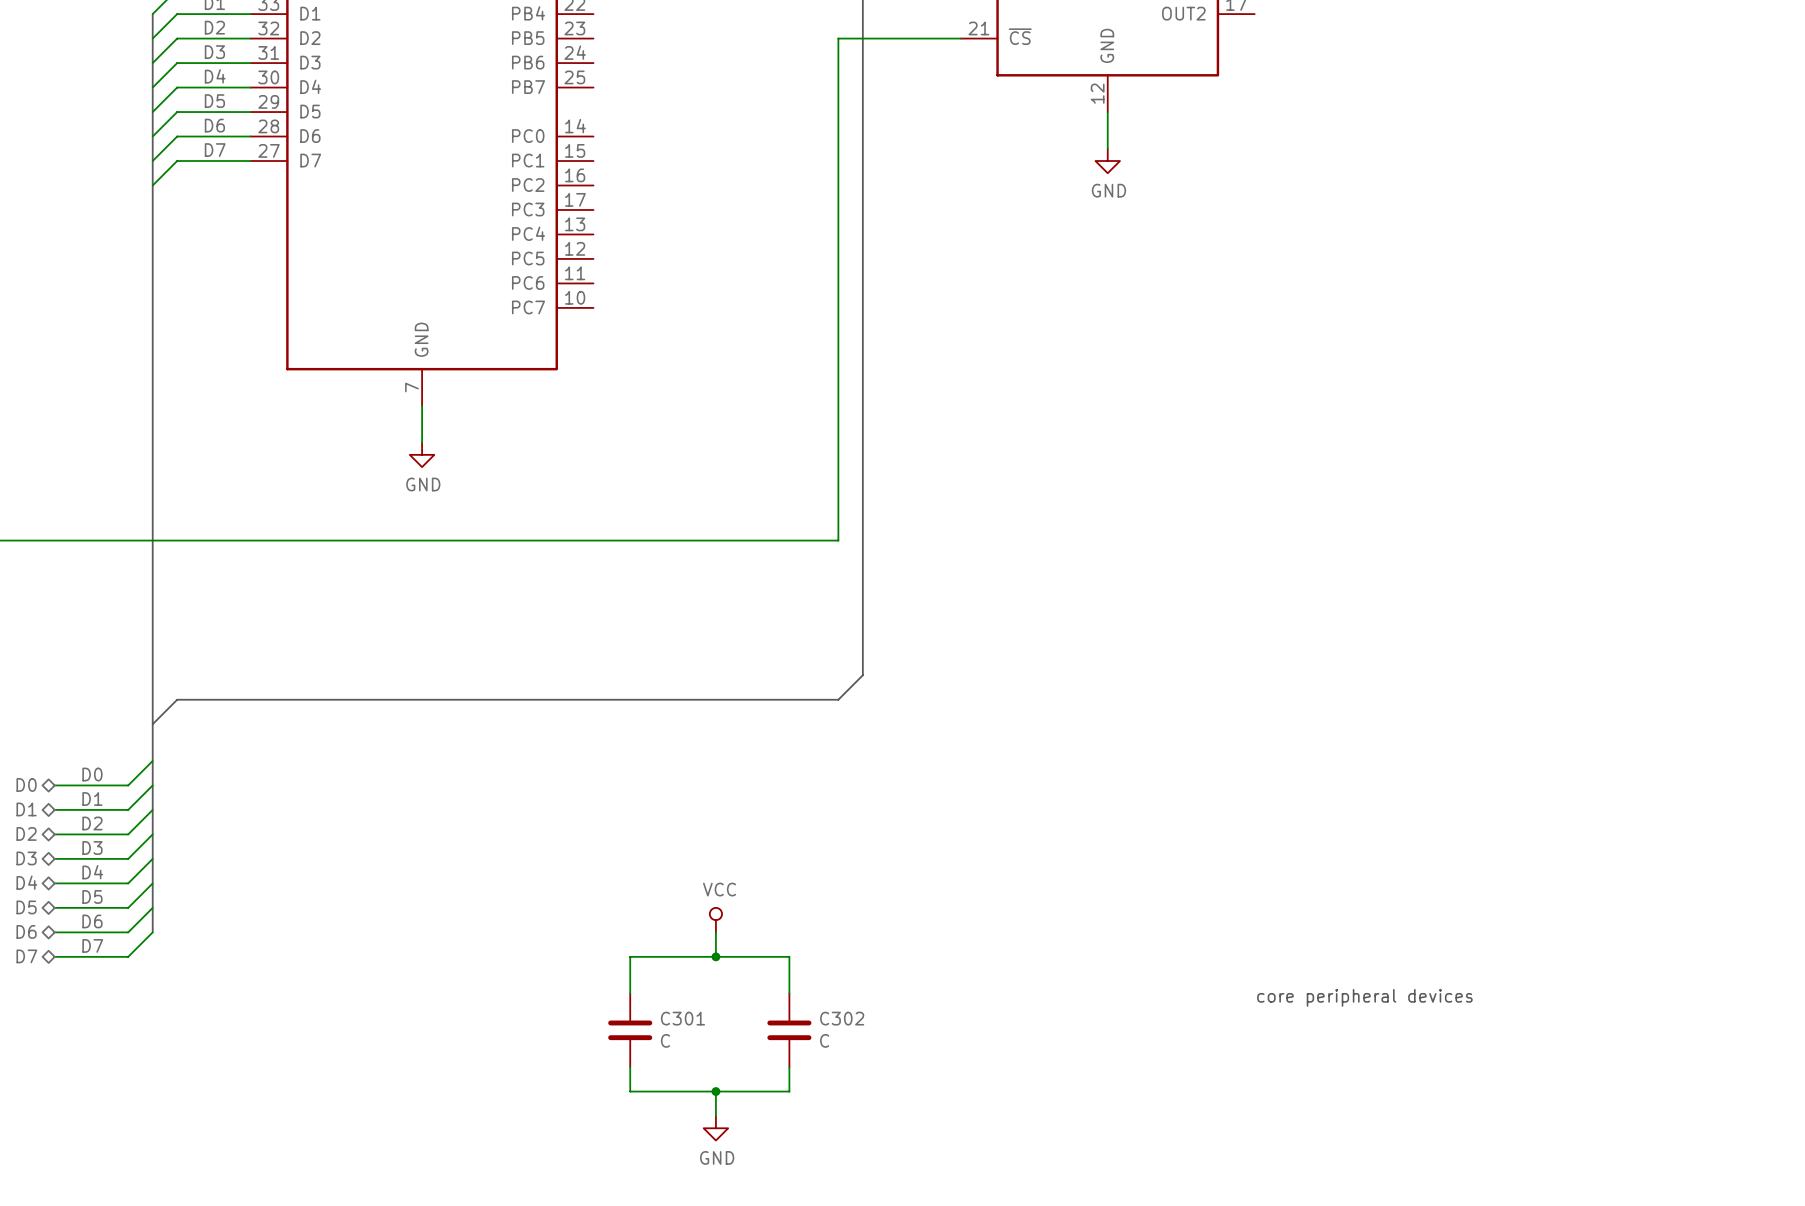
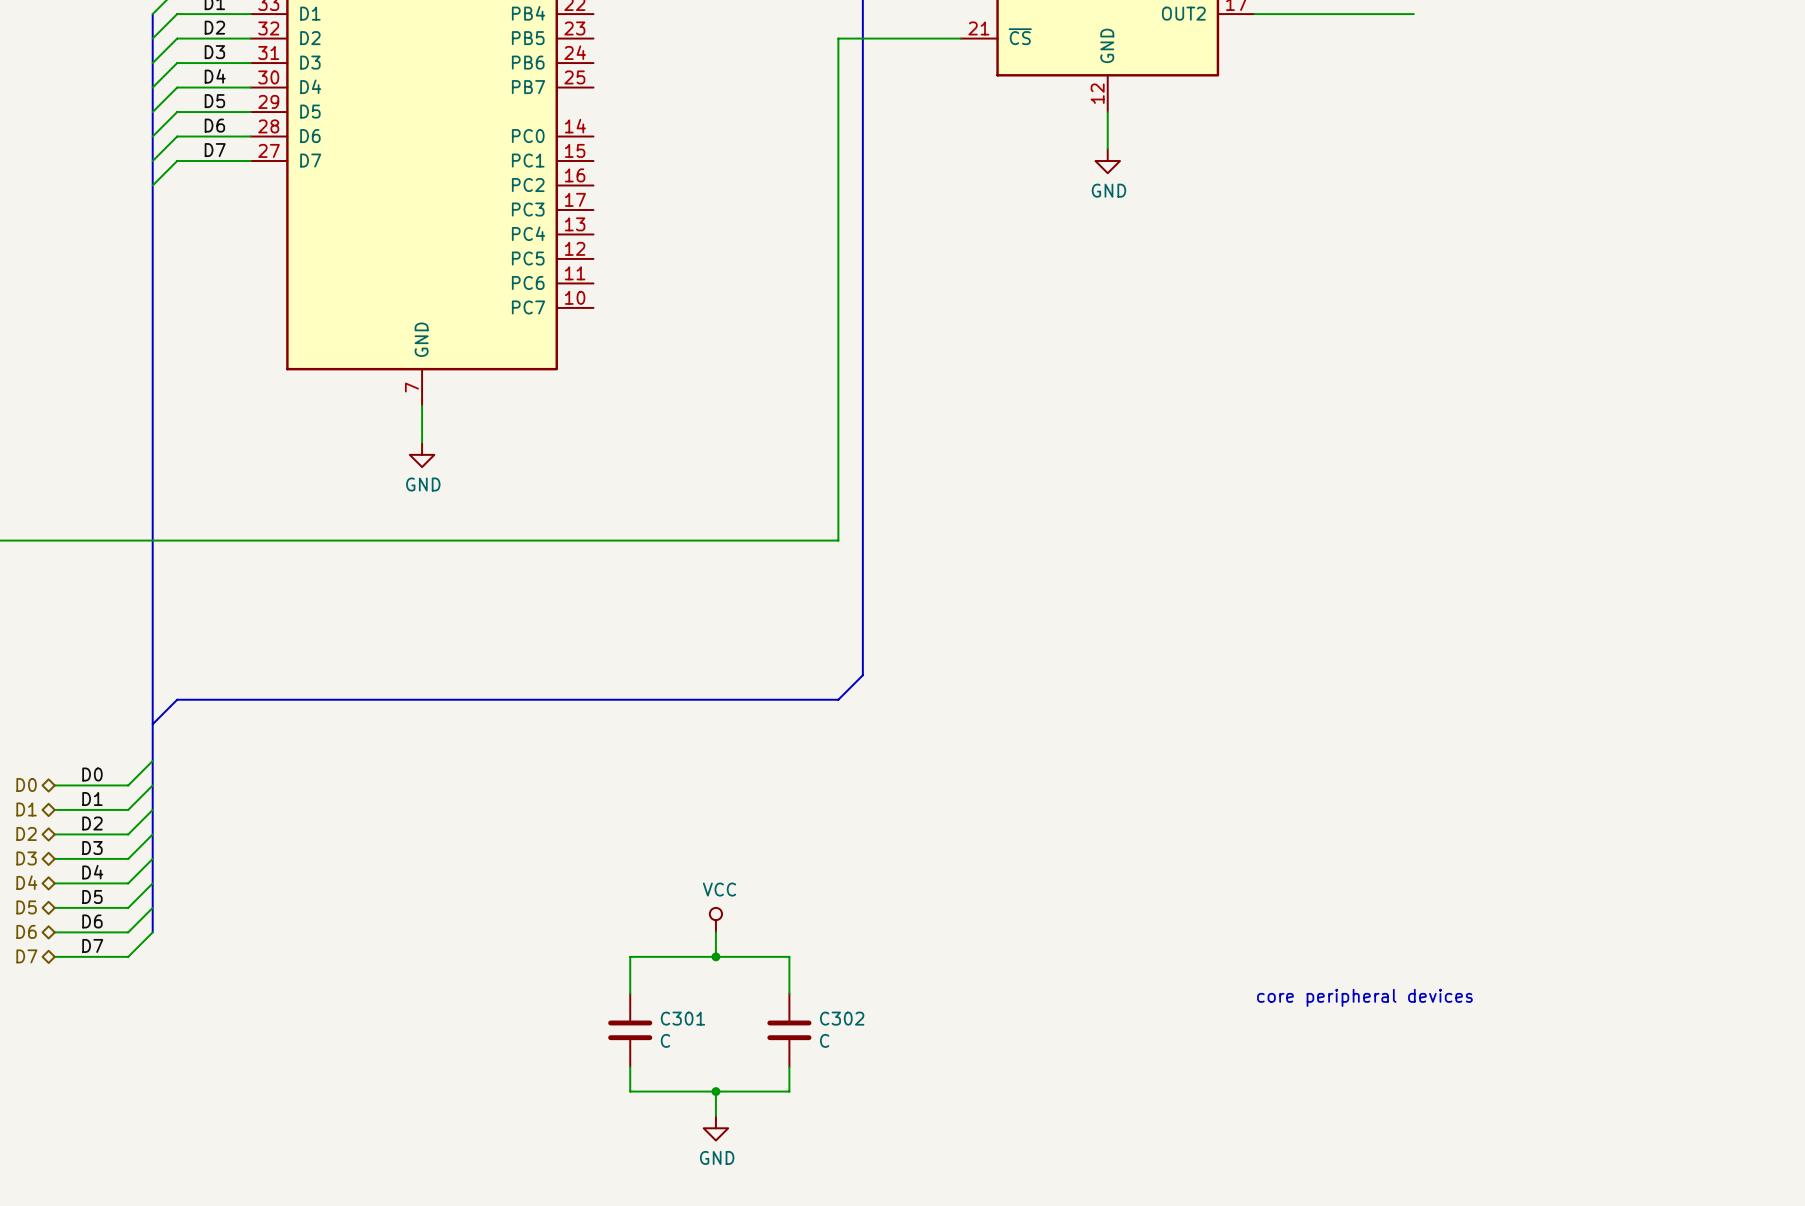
wire: none -> (1254, 14) (1413, 14)

